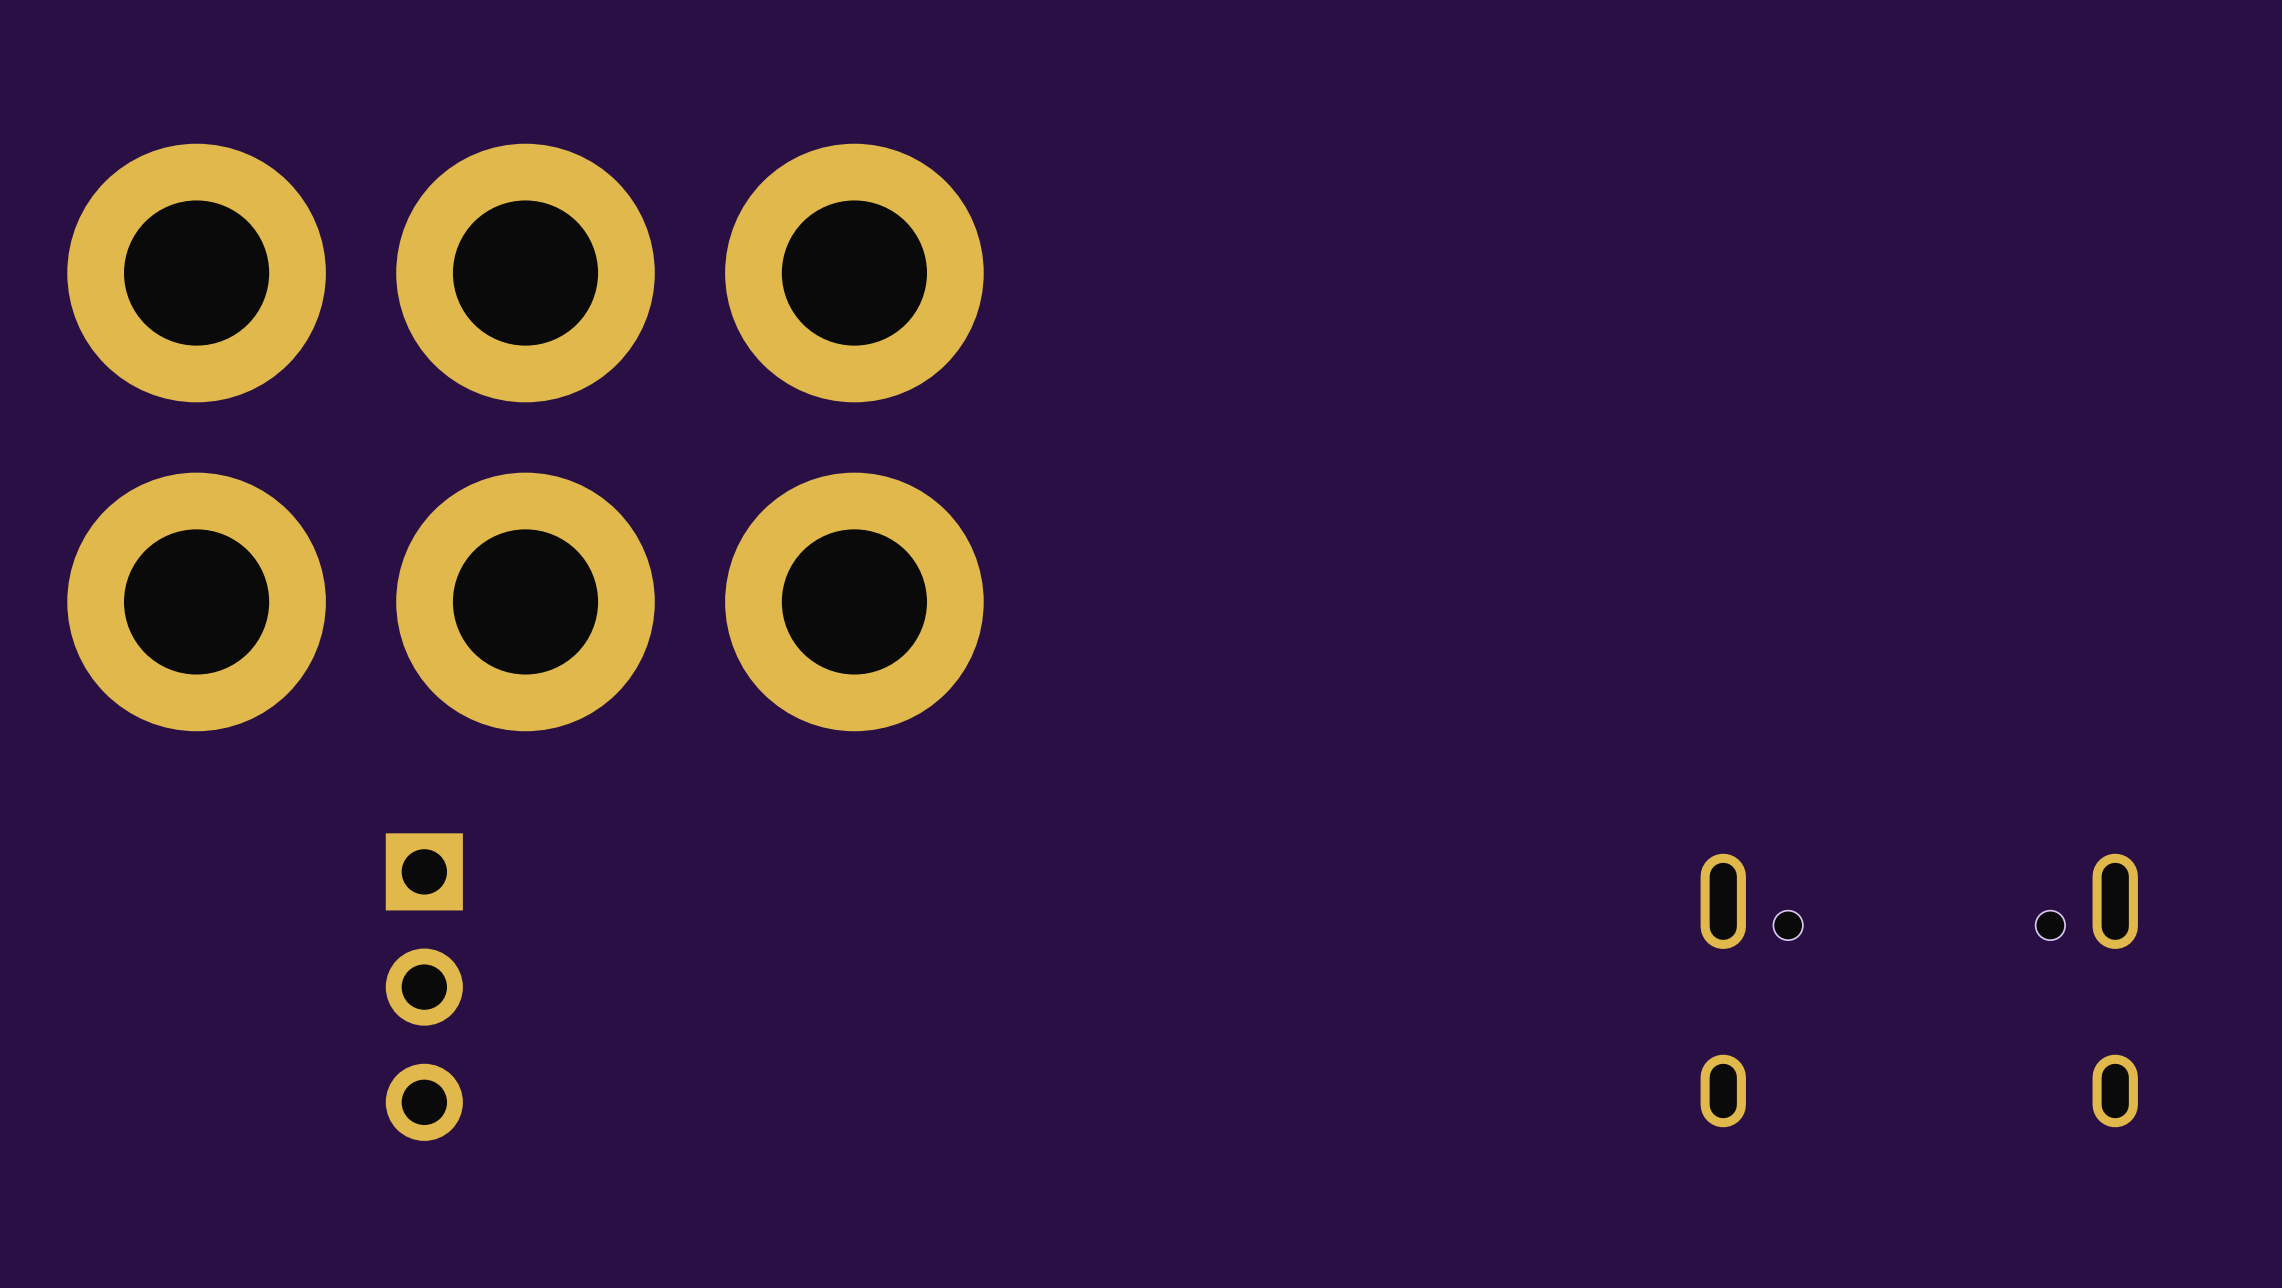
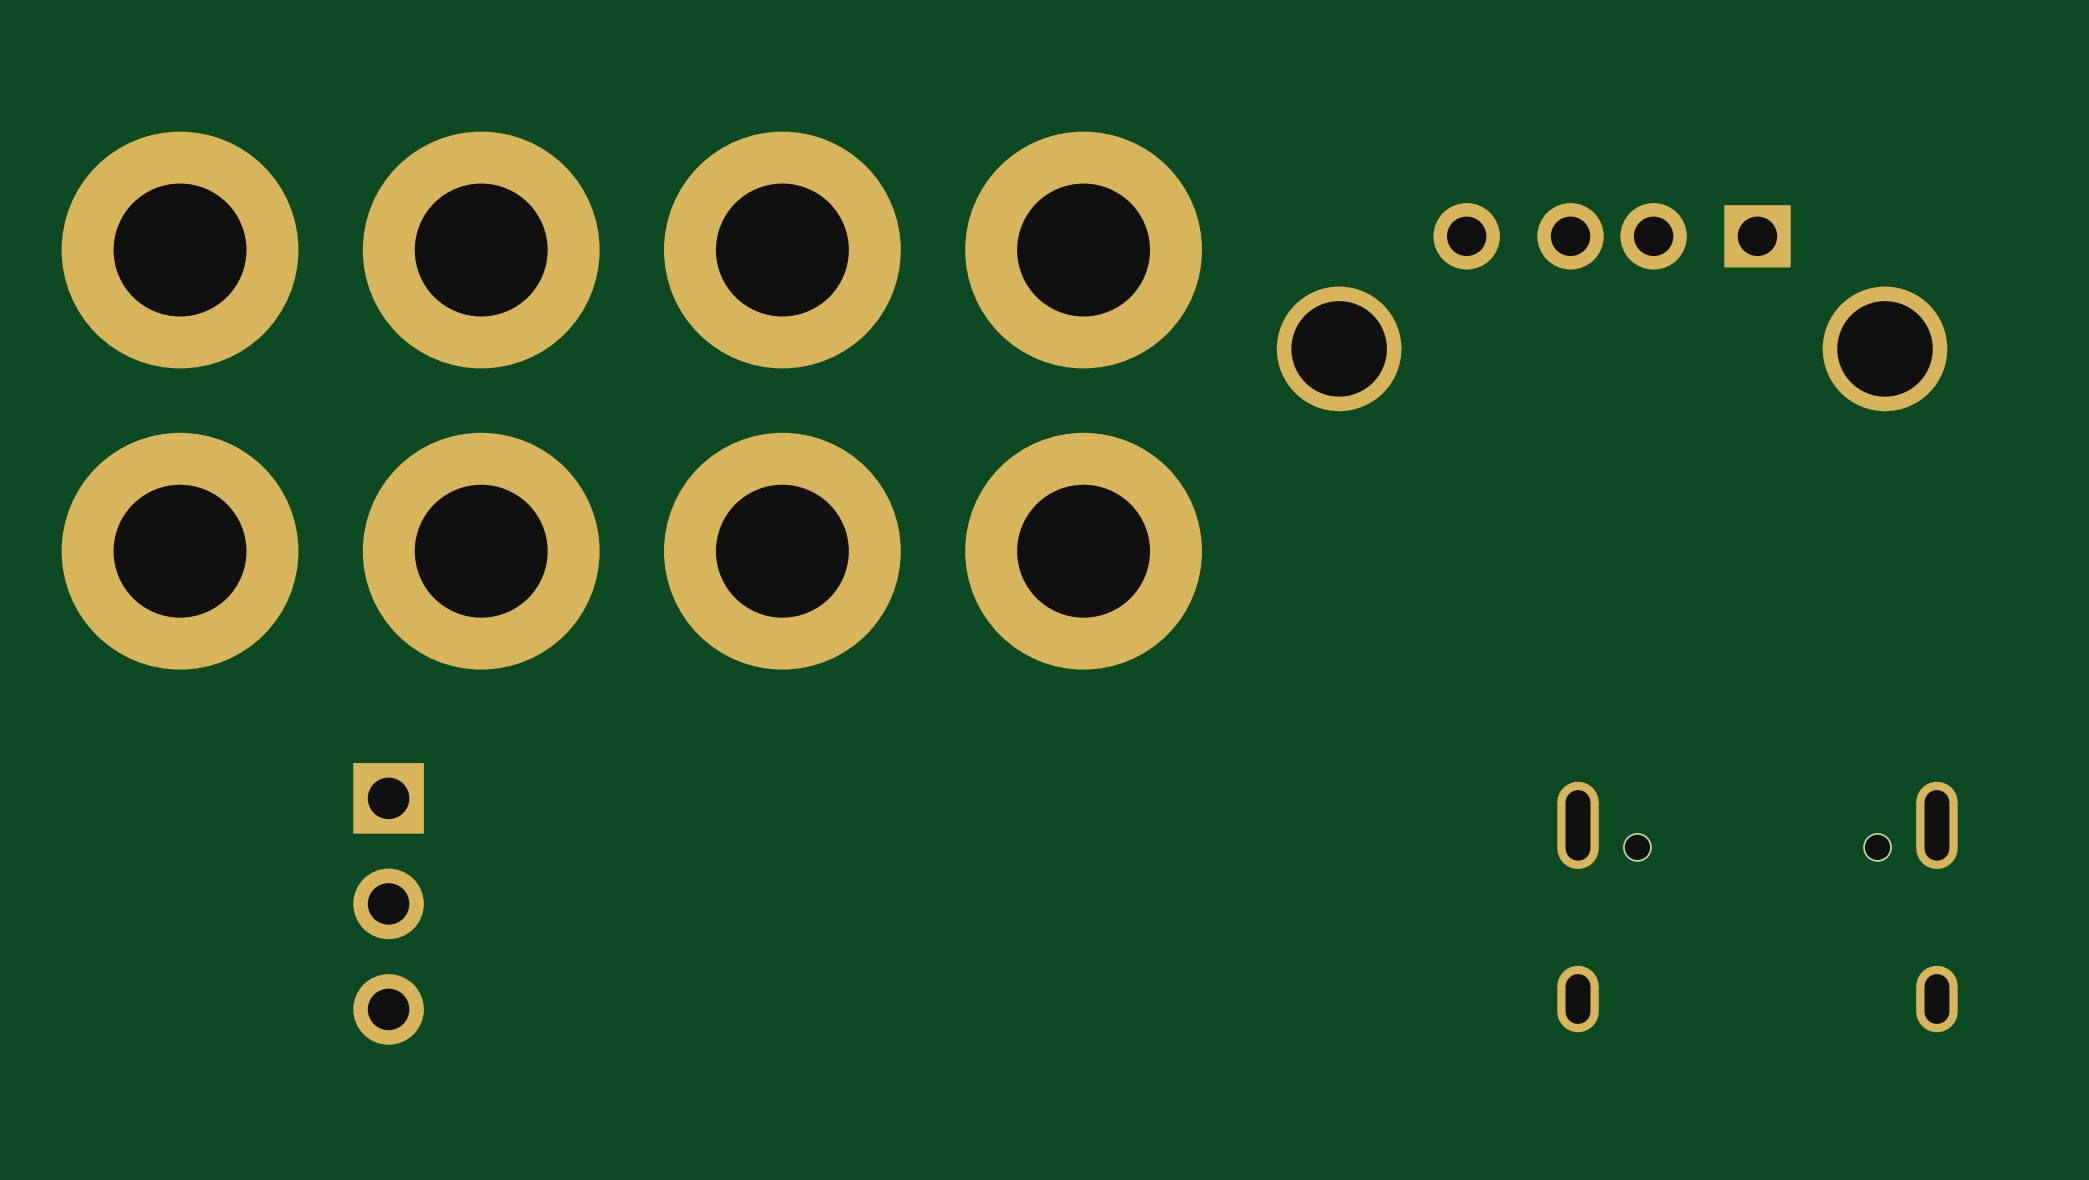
part: none -> (1083, 250)
part: none -> (1612, 307)
part: none -> (1083, 551)

